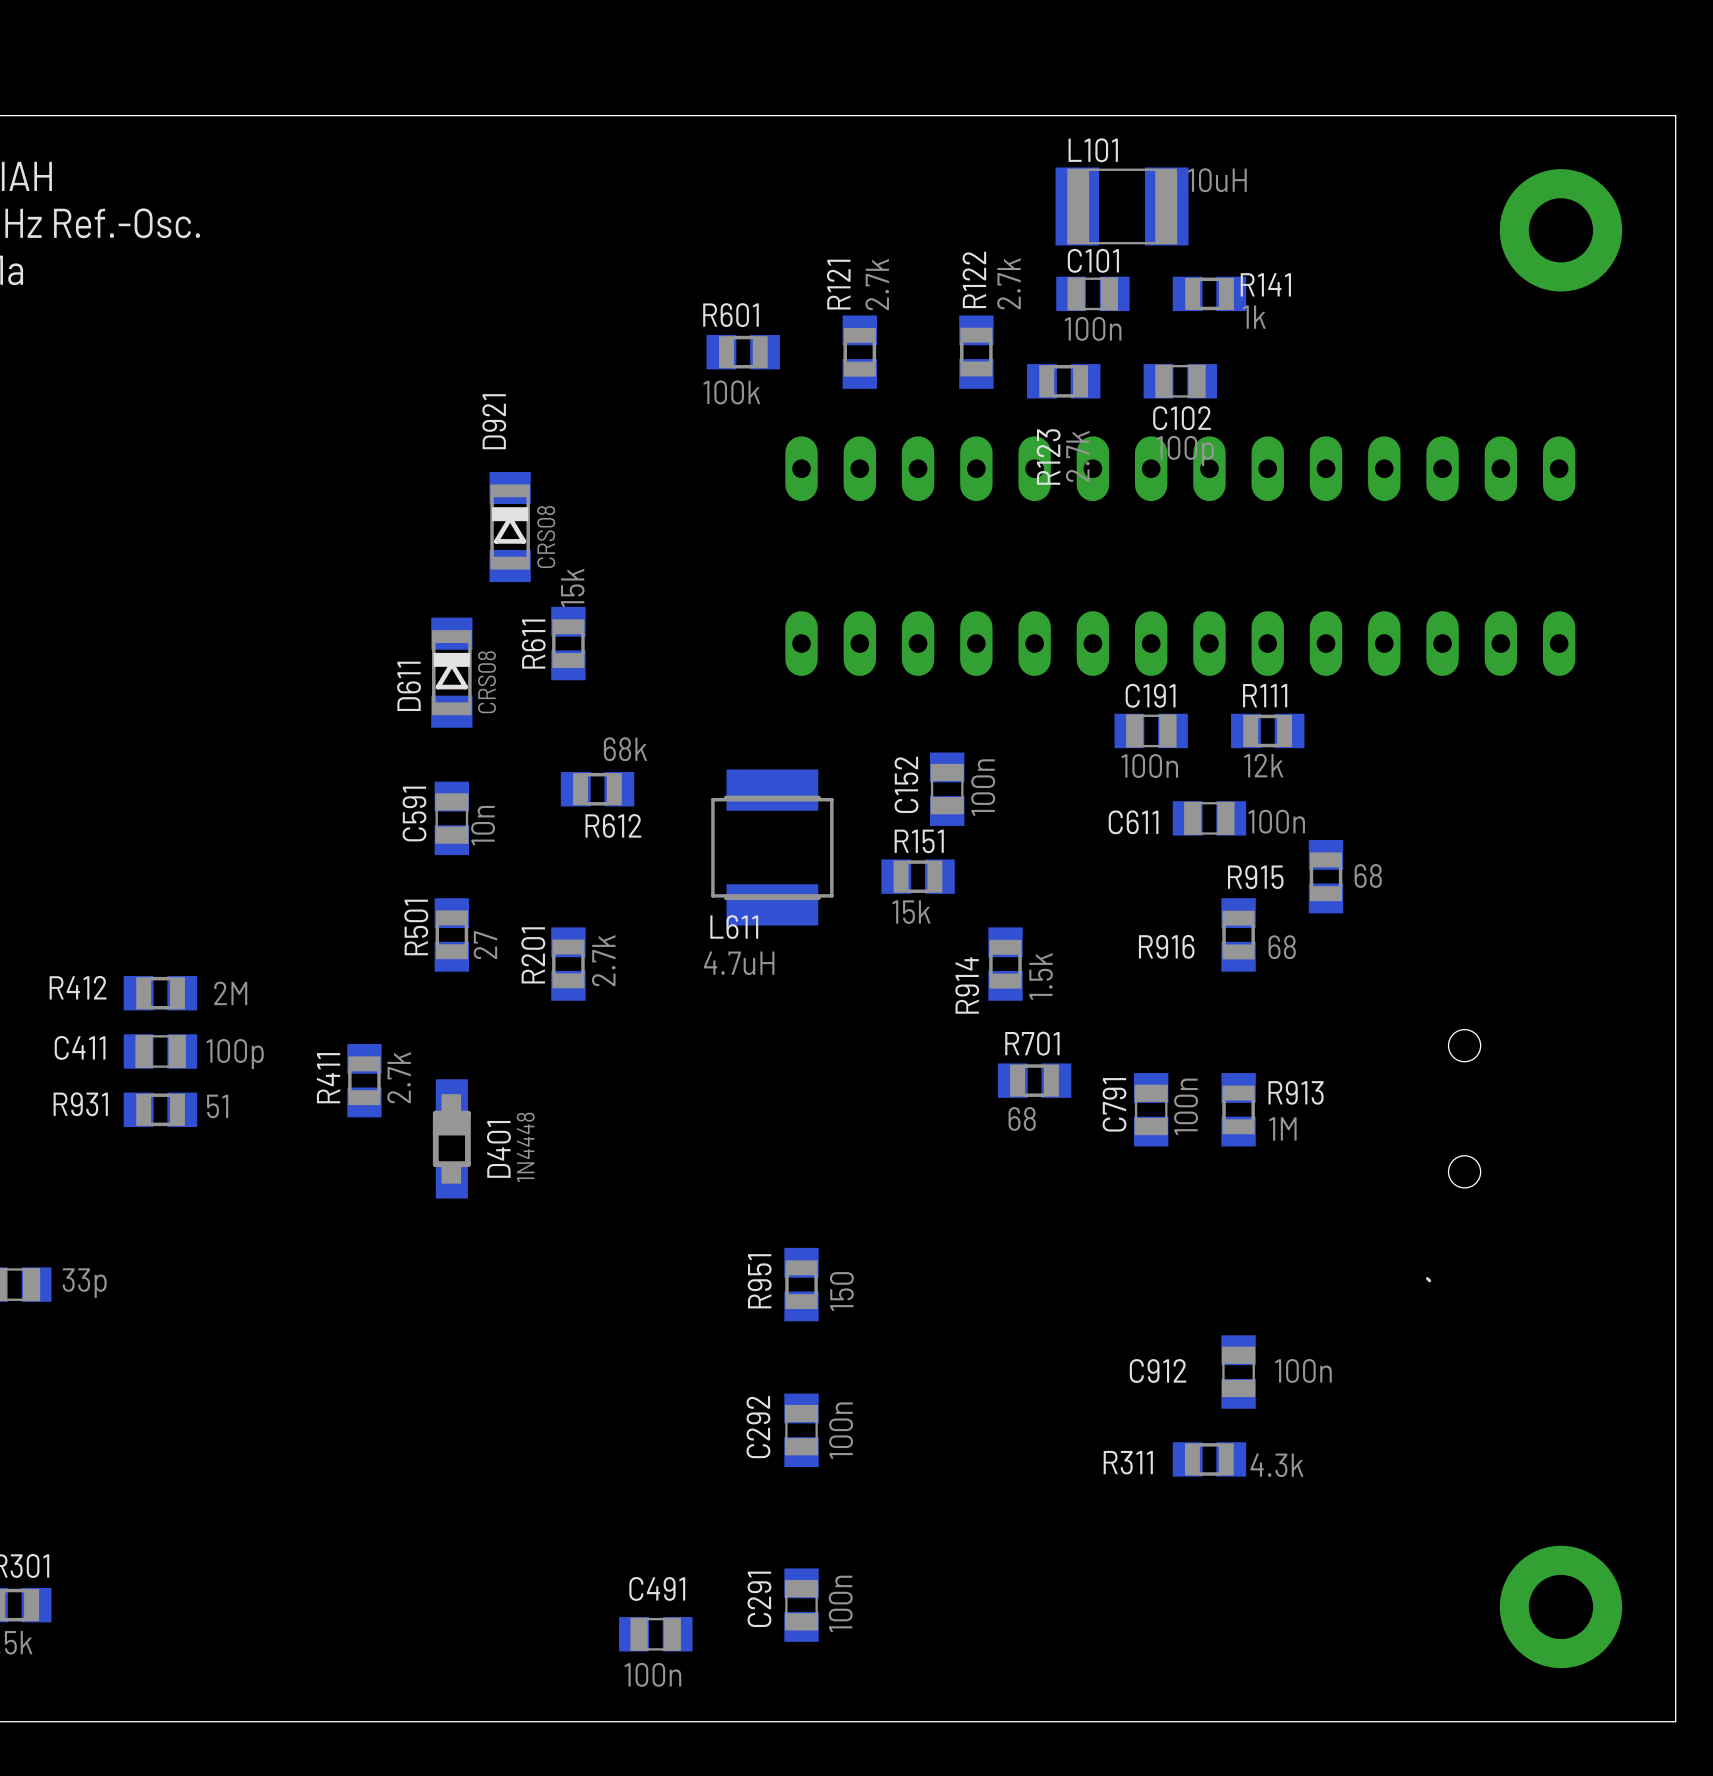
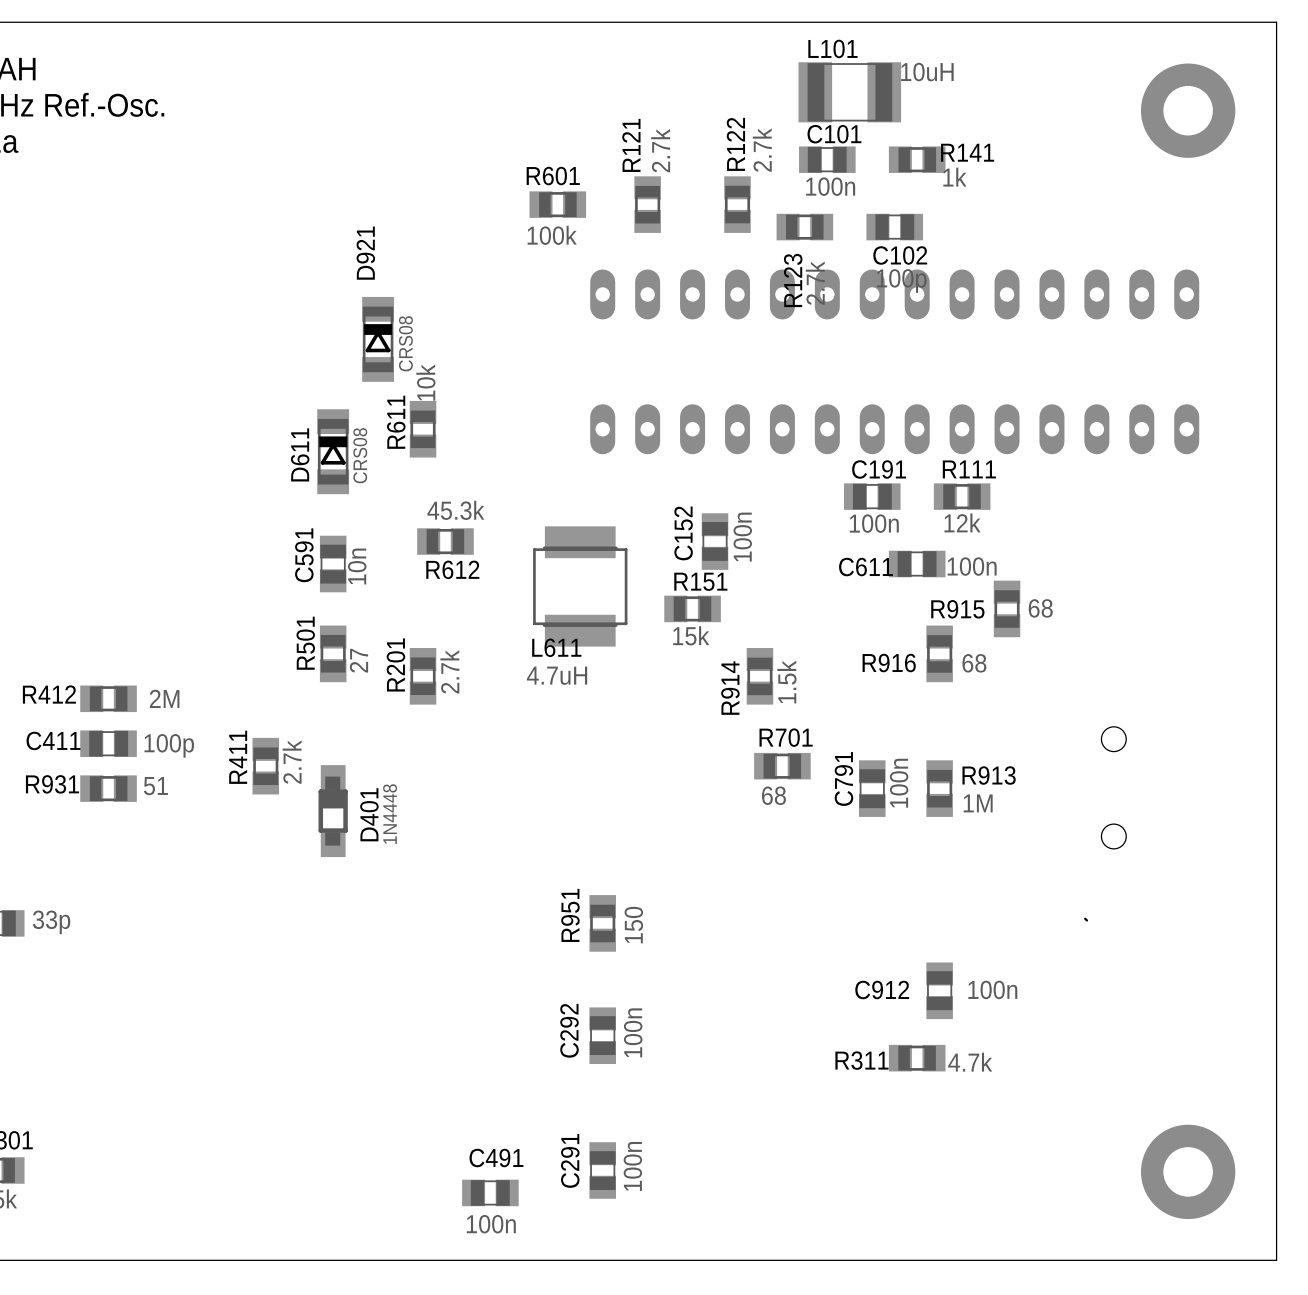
R611 value: 15k (572, 587) -> 10k (425, 382)
R612 value: 68k (625, 749) -> 45.3k (455, 510)
R311 value: 4.3k (1276, 1465) -> 4.7k (970, 1062)

